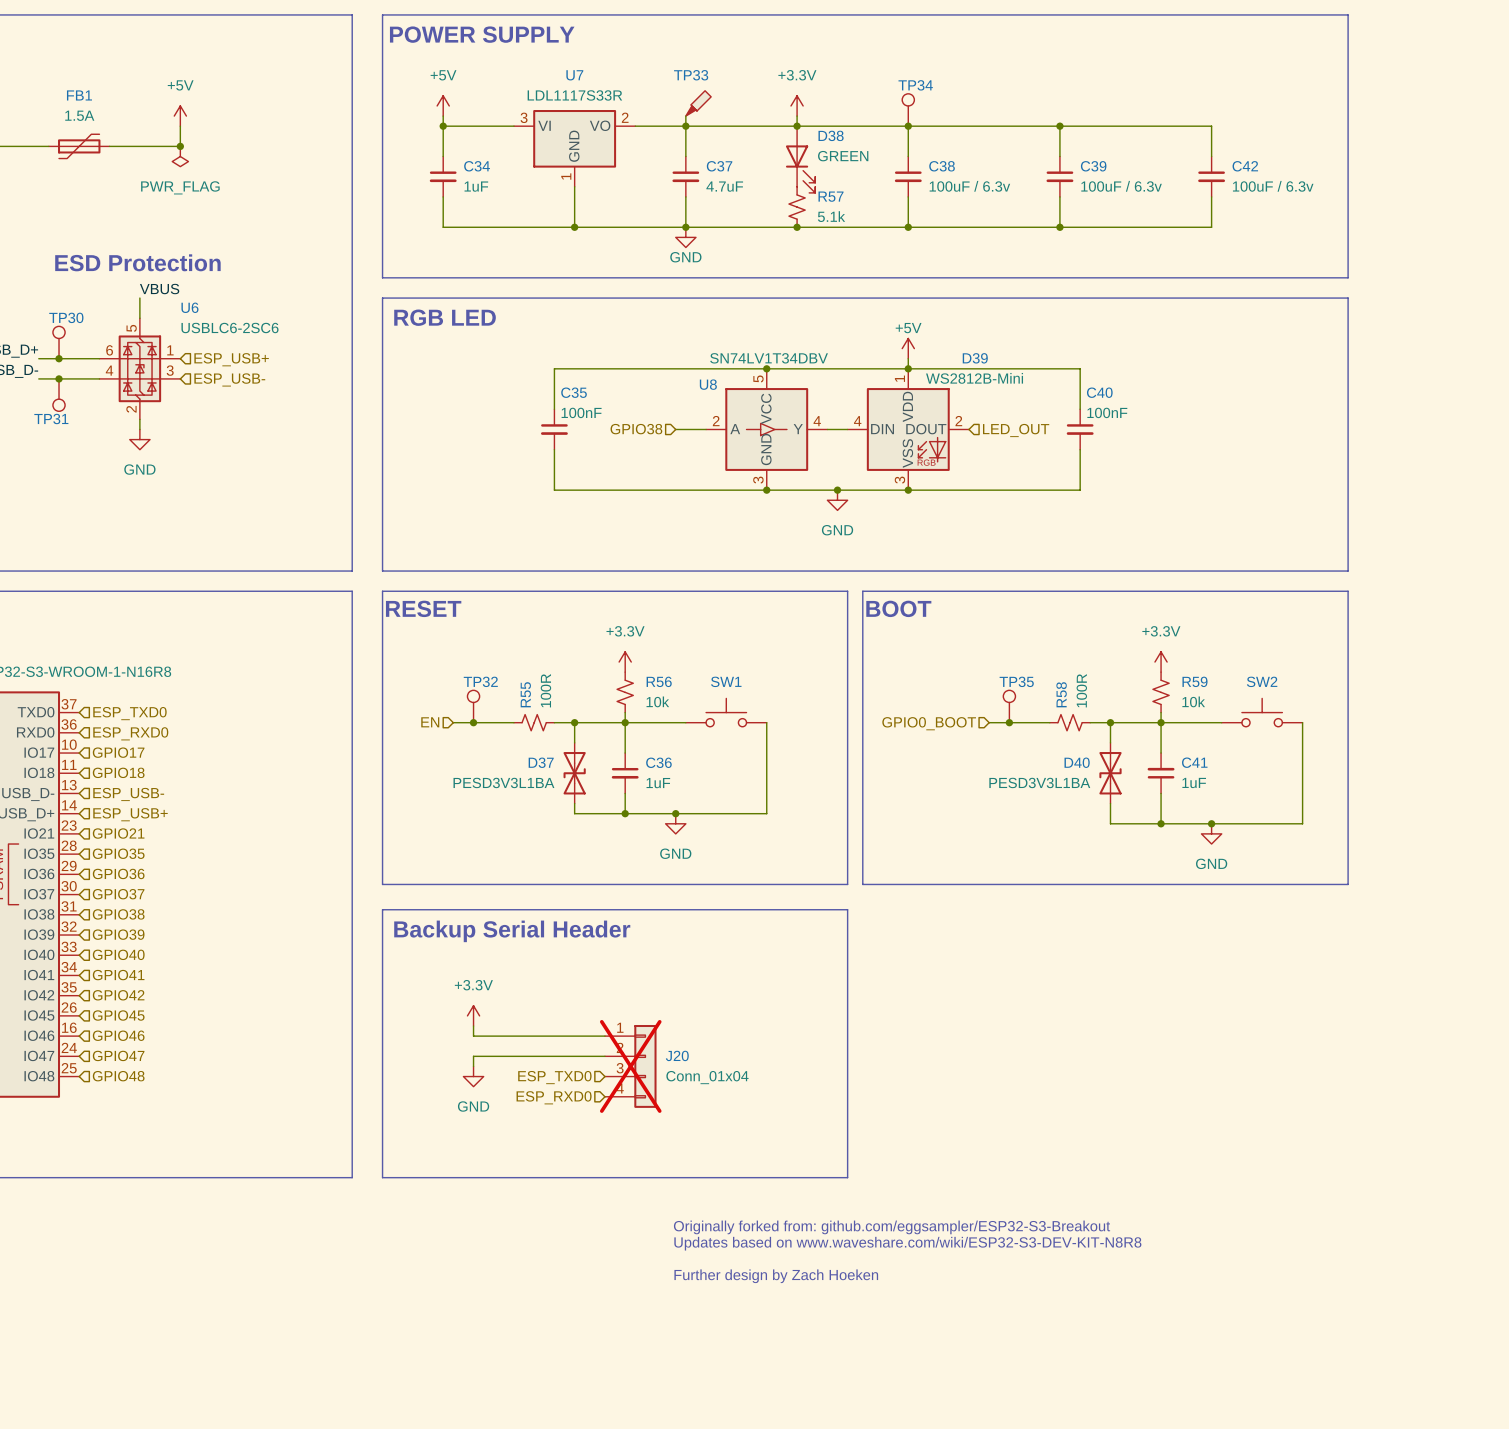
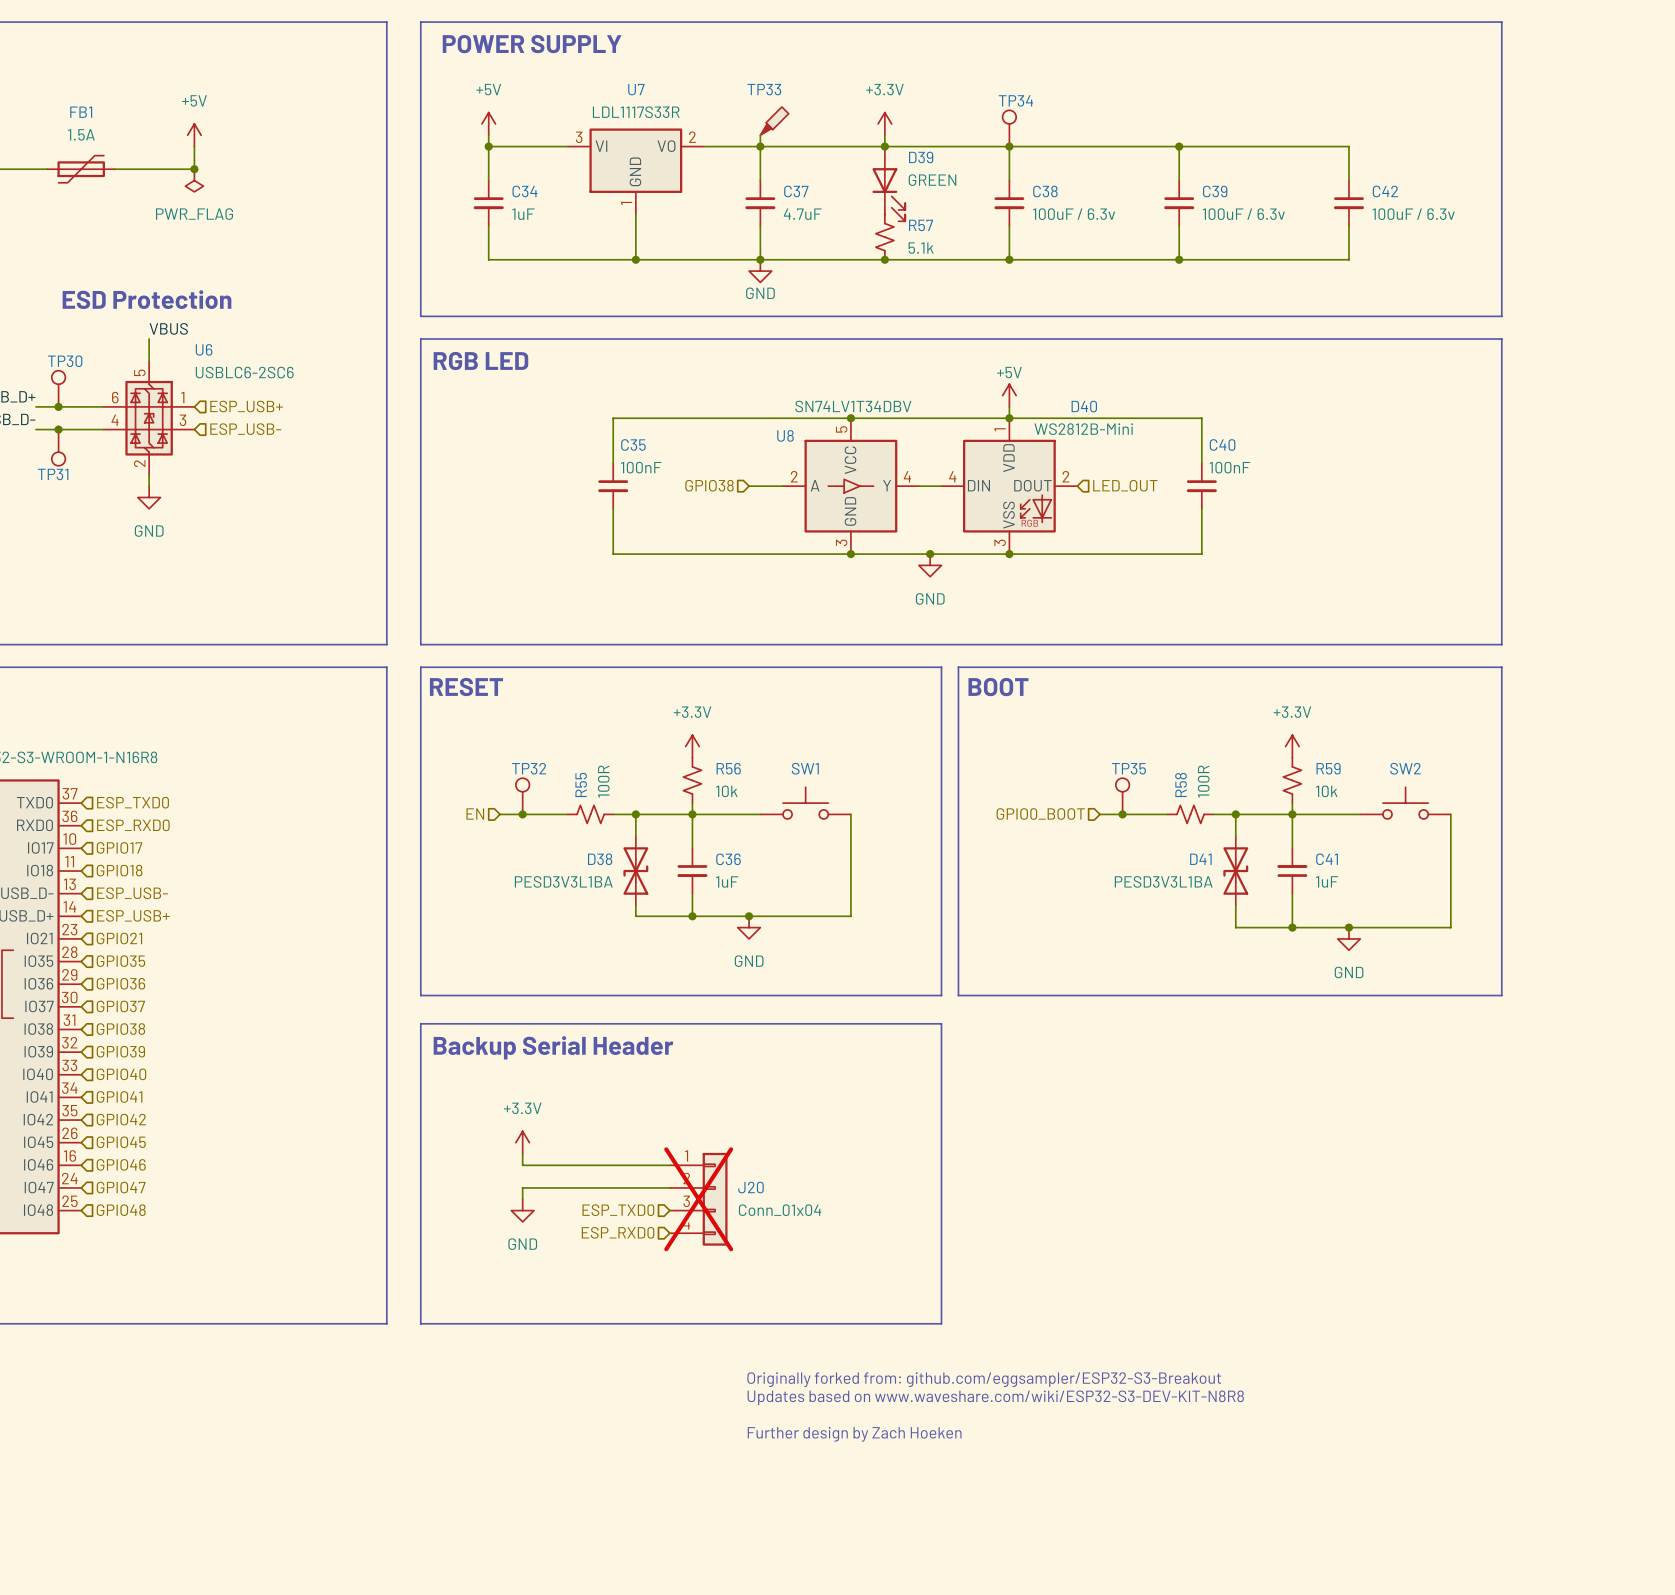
D38 name: D38 (831, 135) -> D39 (921, 157)
D39 name: D39 (975, 358) -> D40 (1084, 406)
D37 name: D37 (541, 762) -> D38 (600, 859)
D40 name: D40 (1077, 762) -> D41 (1200, 859)

